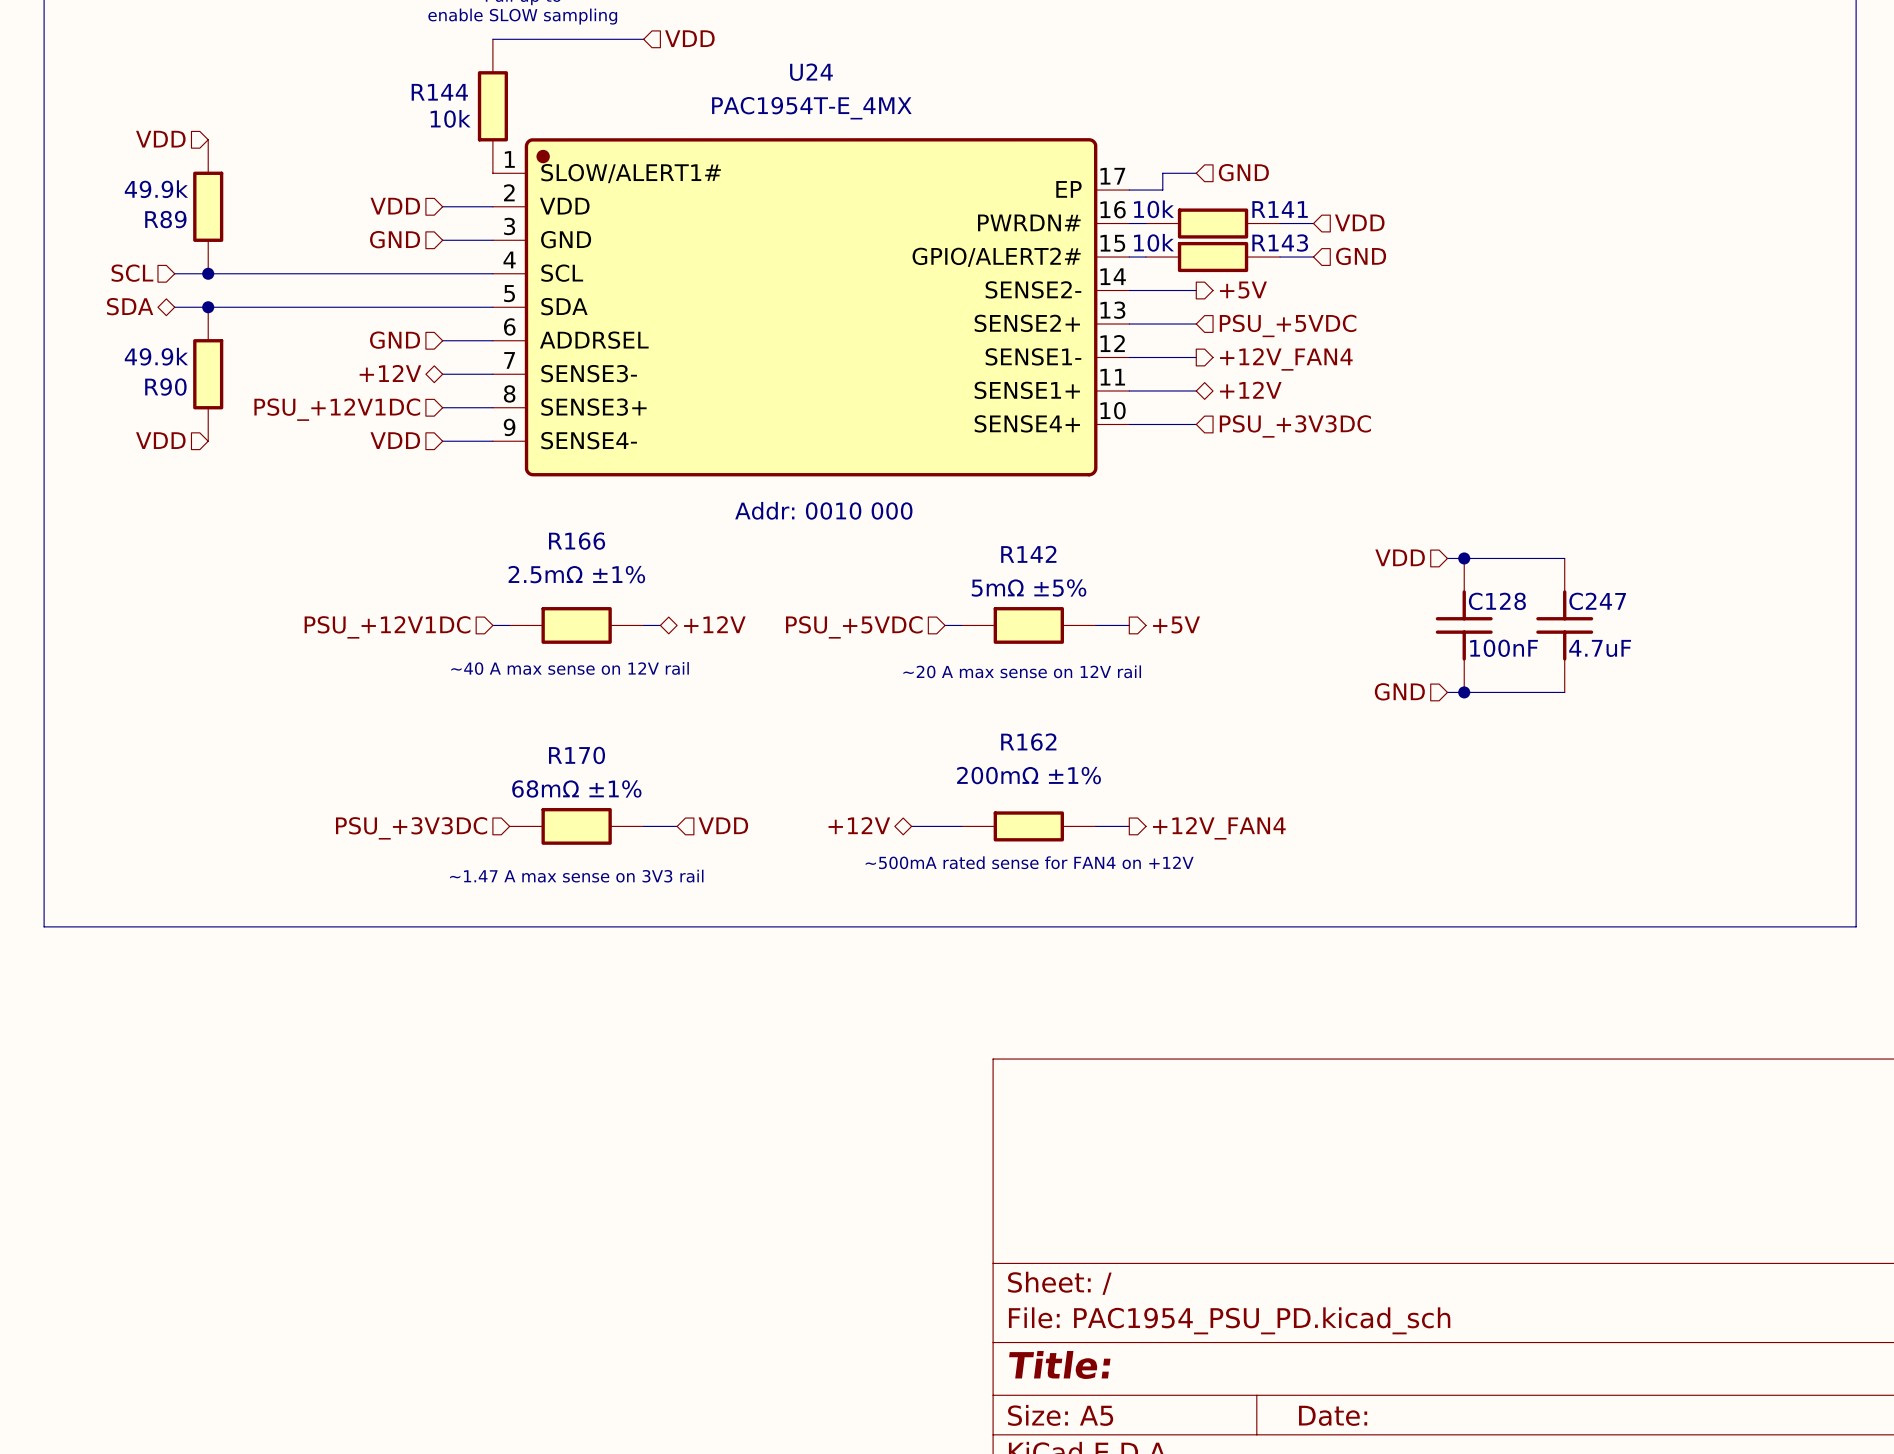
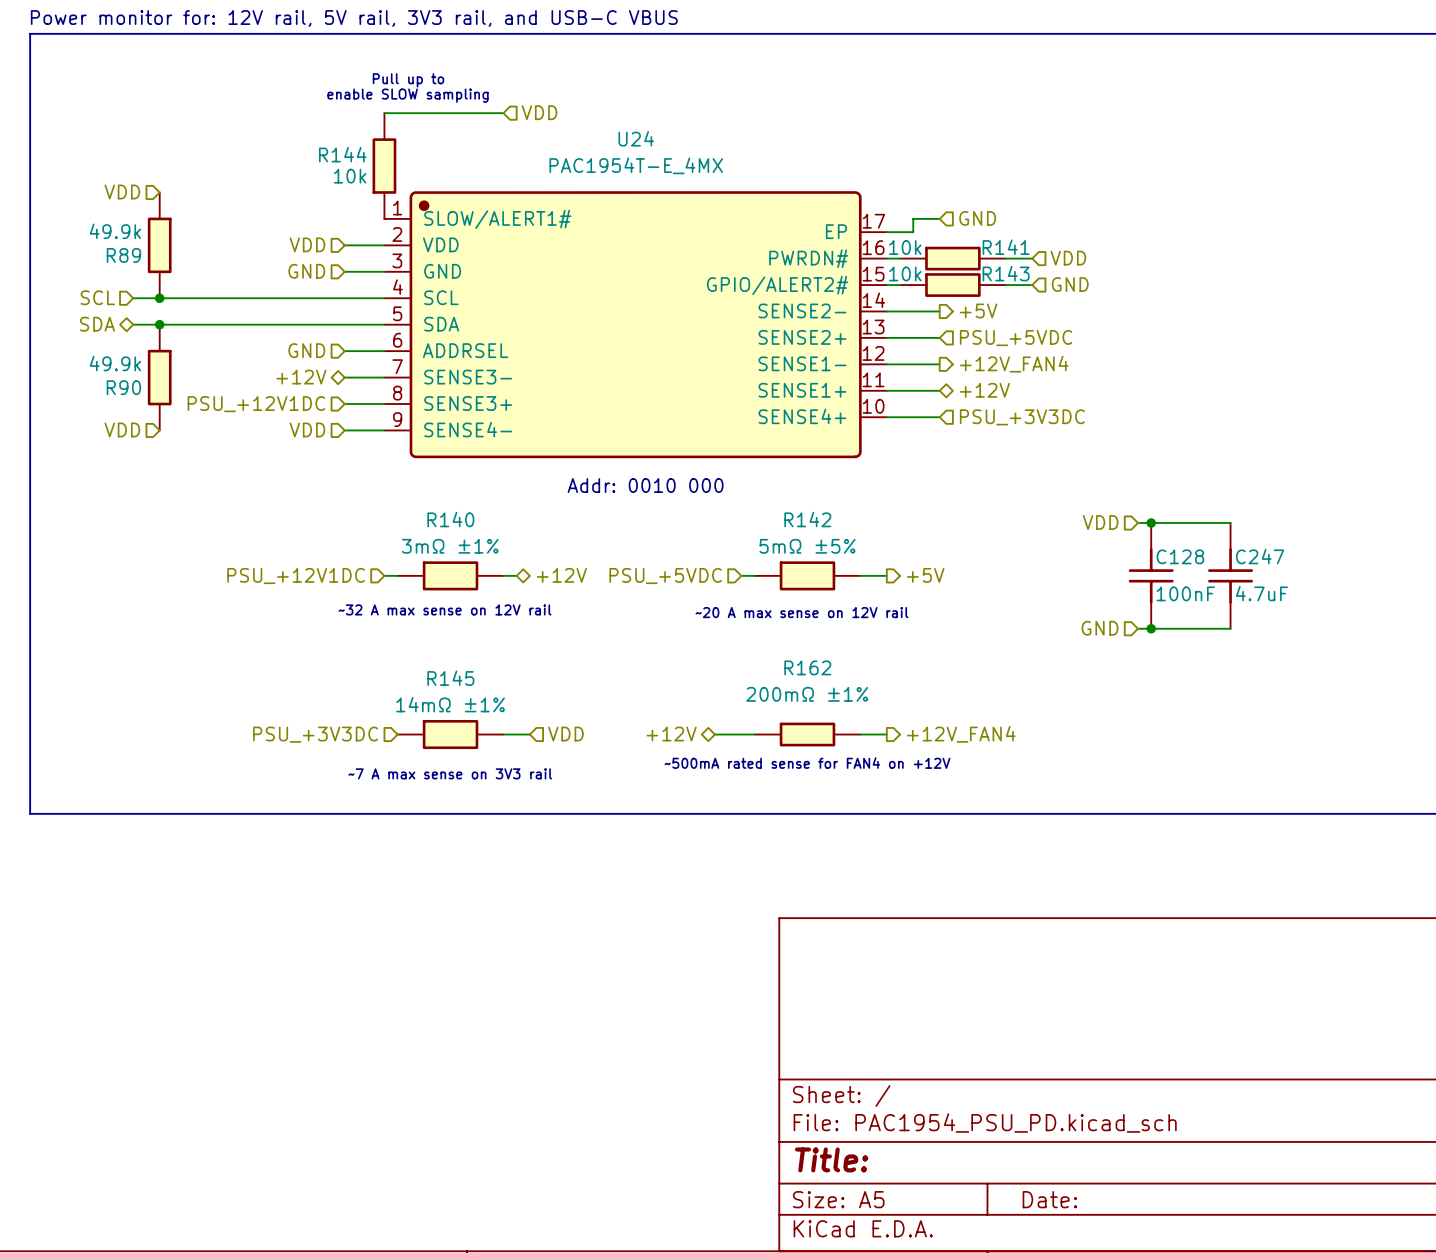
R166 name: R166 (577, 541) -> R140 (450, 519)
R166 value: 2.5mΩ ±1% (576, 574) -> 3mΩ ±1% (450, 546)
text: ~40 A max sense on 12V rail (570, 668) -> ~32 A max sense on 12V rail (445, 609)
R170 name: R170 (577, 755) -> R145 (450, 678)
R170 value: 68mΩ ±1% (576, 788) -> 14mΩ ±1% (450, 704)
text: ~1.47 A max sense on 3V3 rail (576, 876) -> ~7 A max sense on 3V3 rail (450, 773)

